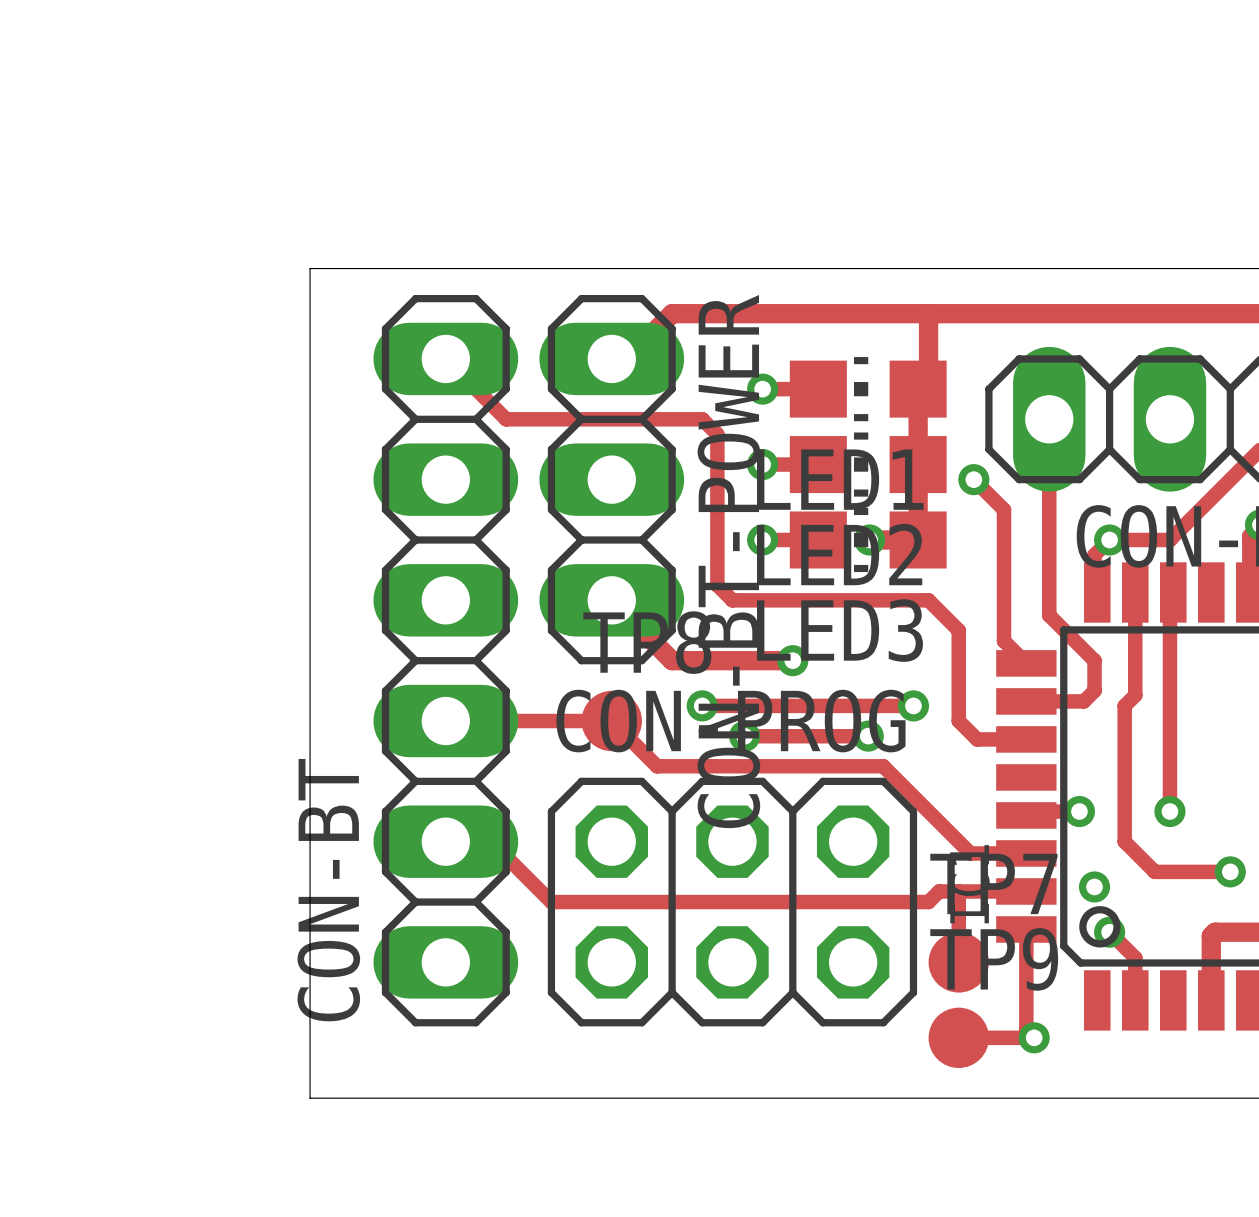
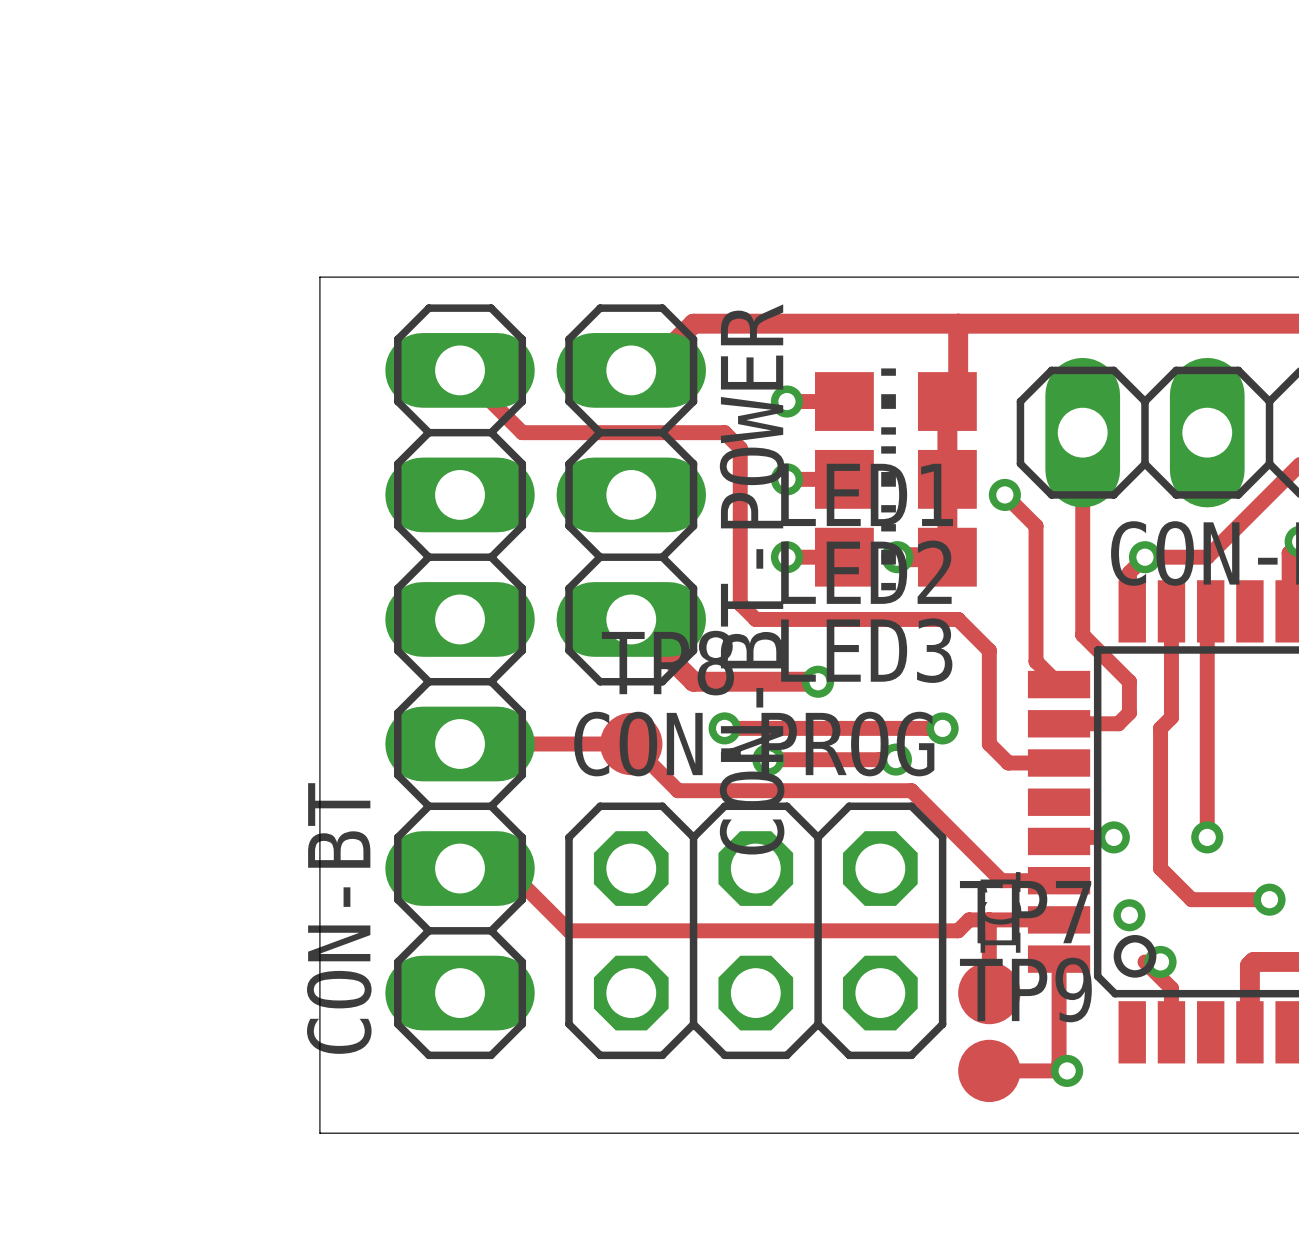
via position: (1109, 932) -> (1160, 961)

